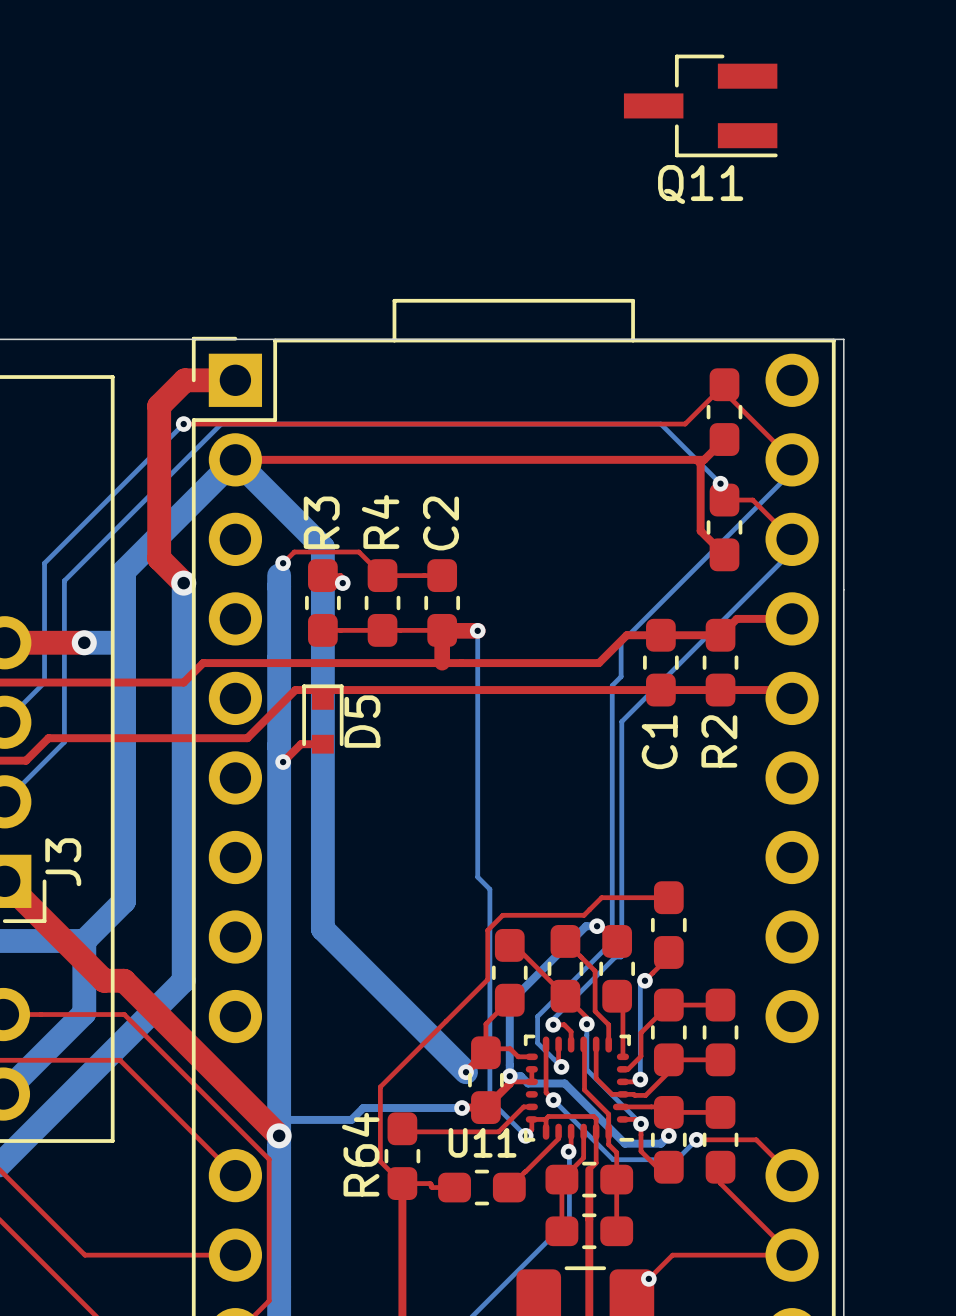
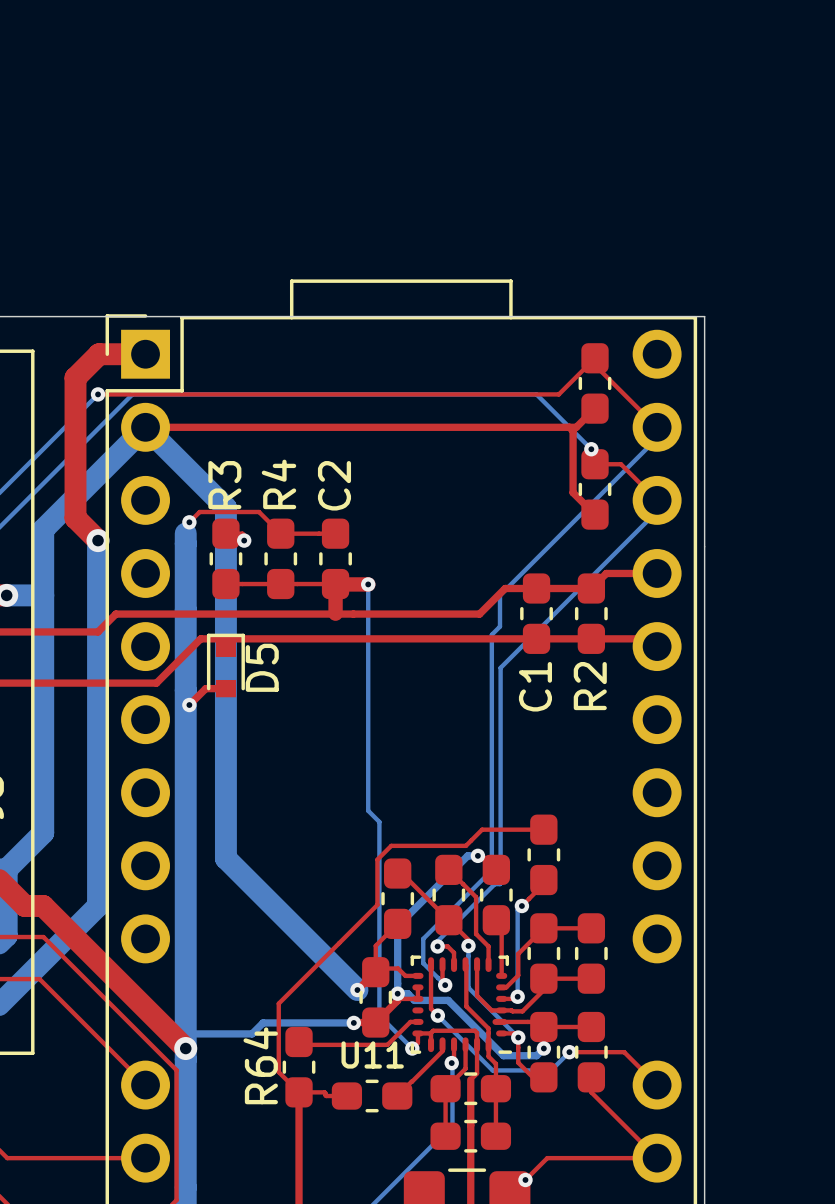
Q11: (700, 105) -> none

